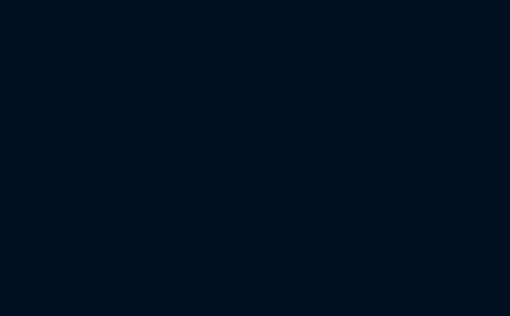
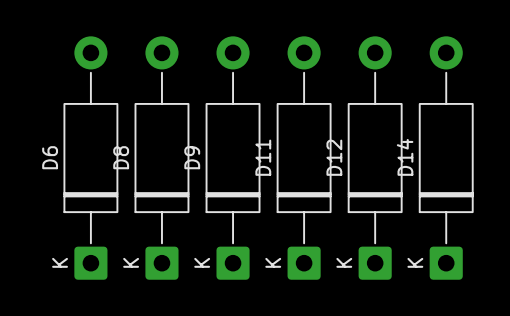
D6: none -> (90, 158)
D8: none -> (161, 158)
D9: none -> (233, 158)
D11: none -> (304, 158)
D12: none -> (375, 158)
D14: none -> (446, 158)

